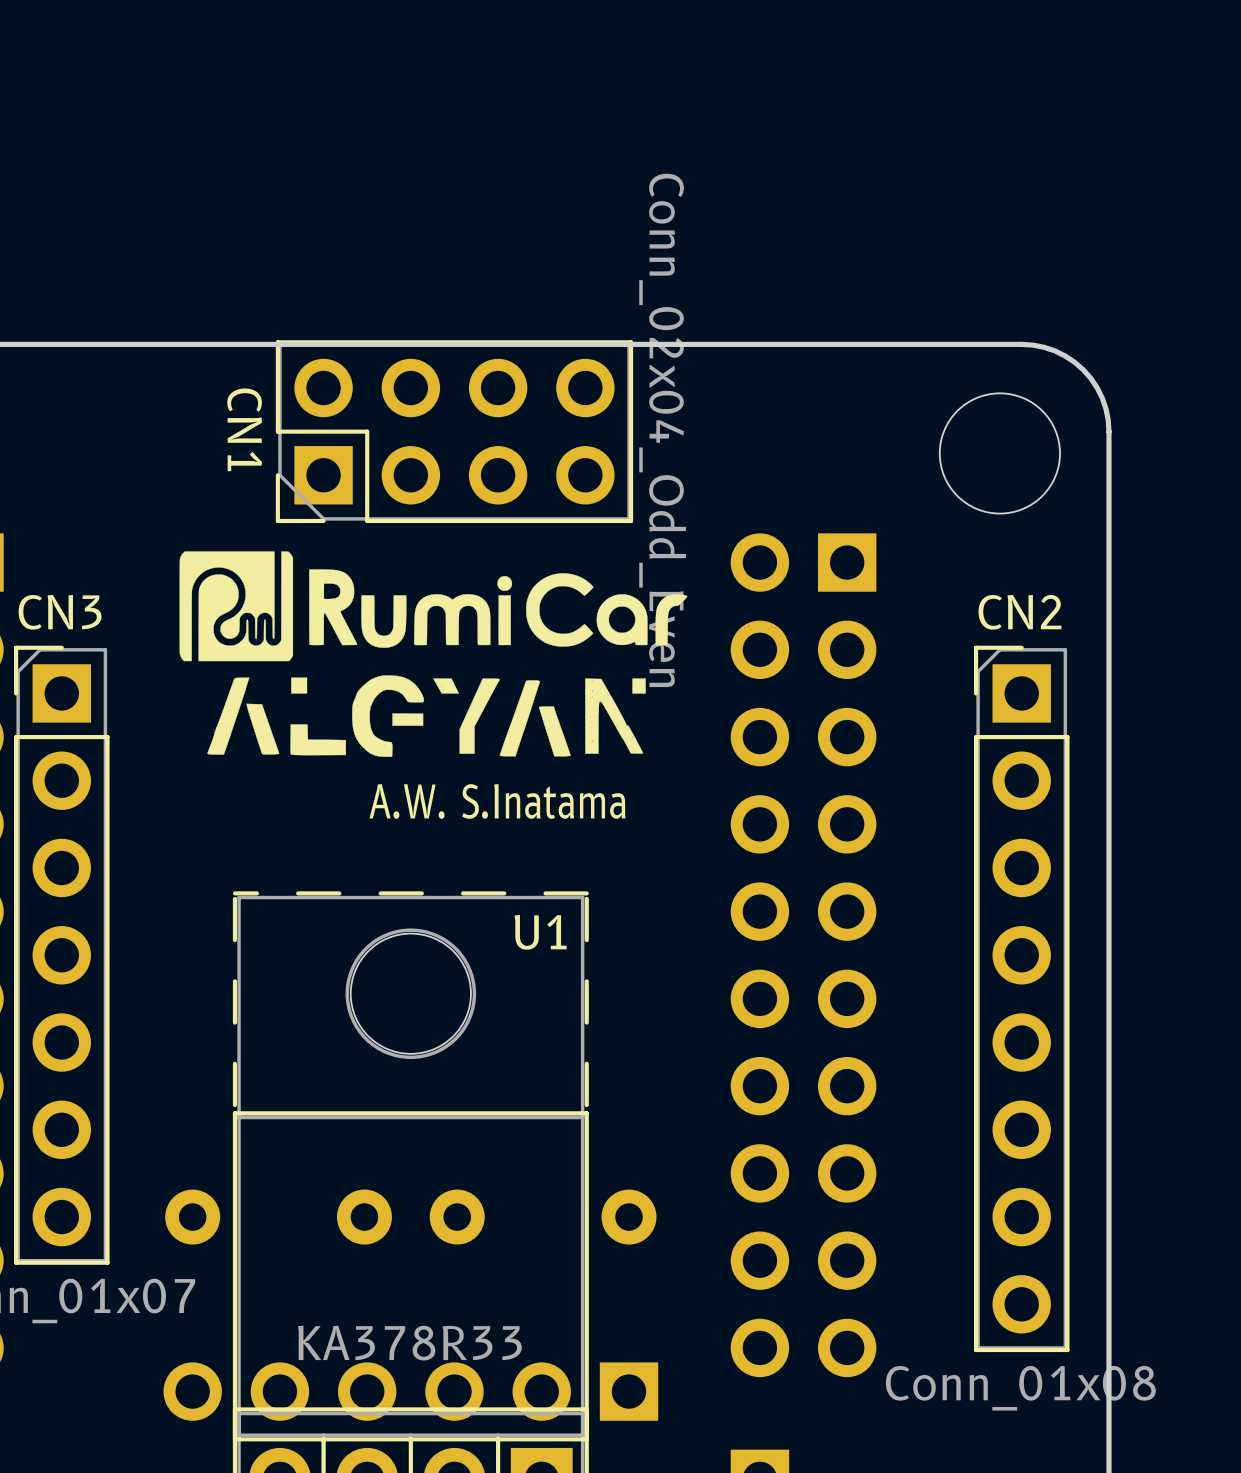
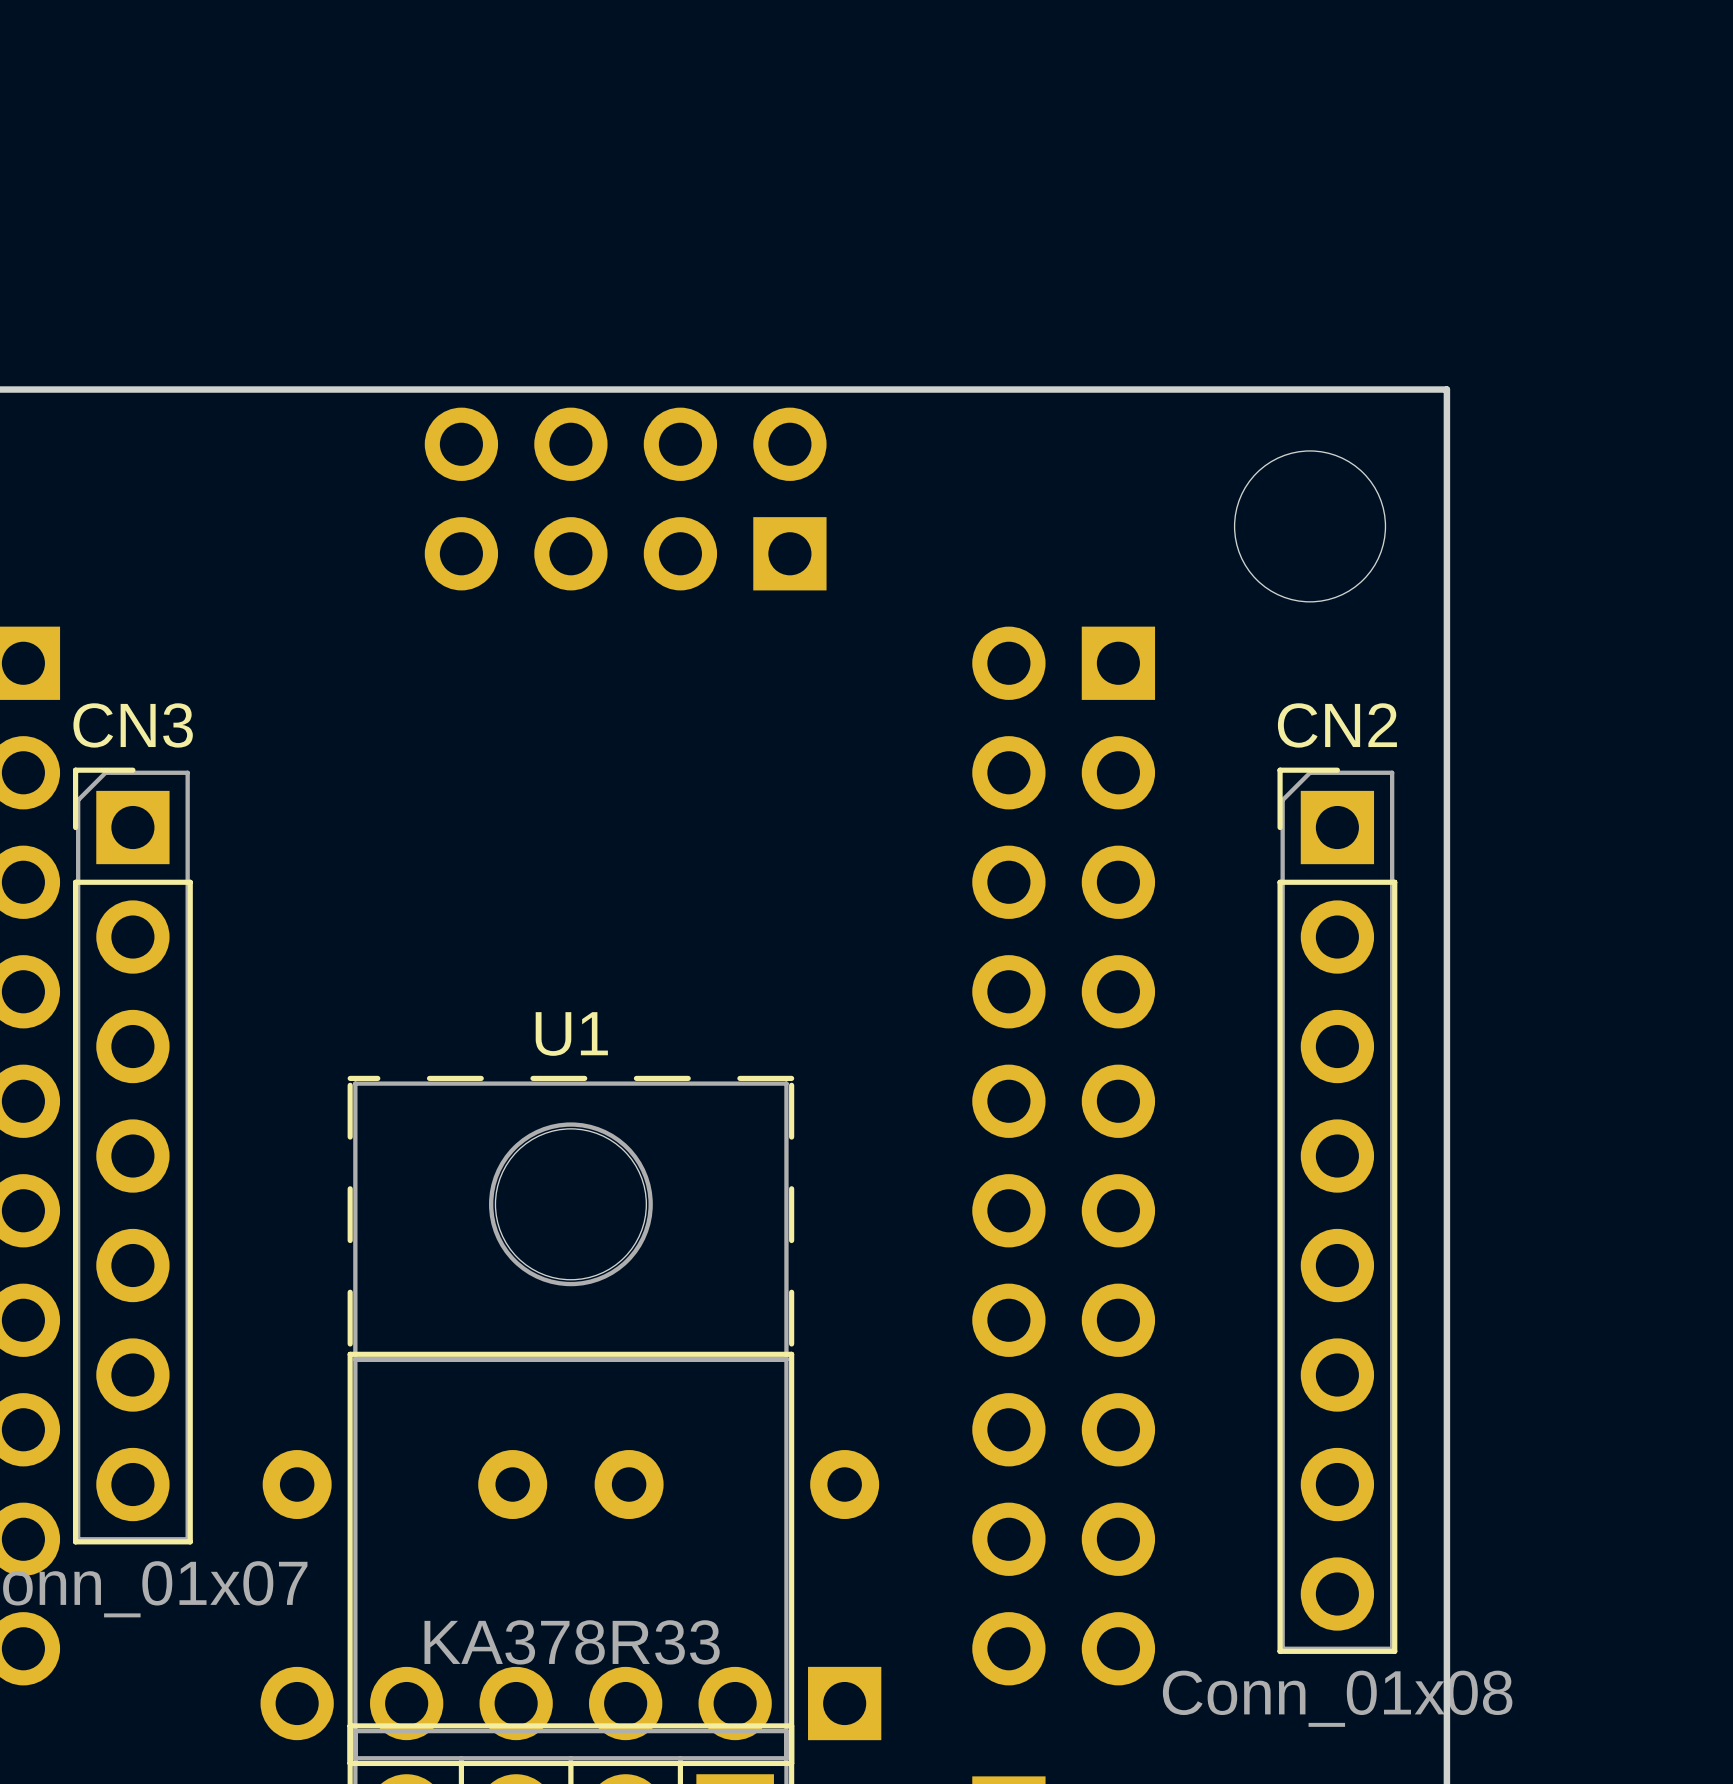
board edge: (1021, 344) (1055, 351) (1083, 369) (1102, 398) (1108, 431) -> (1337, 389) (1446, 389) (1446, 499)
CN1 side: bottom (454, 431) -> top (625, 499)
drawing: [179, 551, 688, 757] -> none
text: A.W. S.Inatama (497, 801) -> none
U1 name position: U1 (540, 932) -> U1 (571, 1034)

